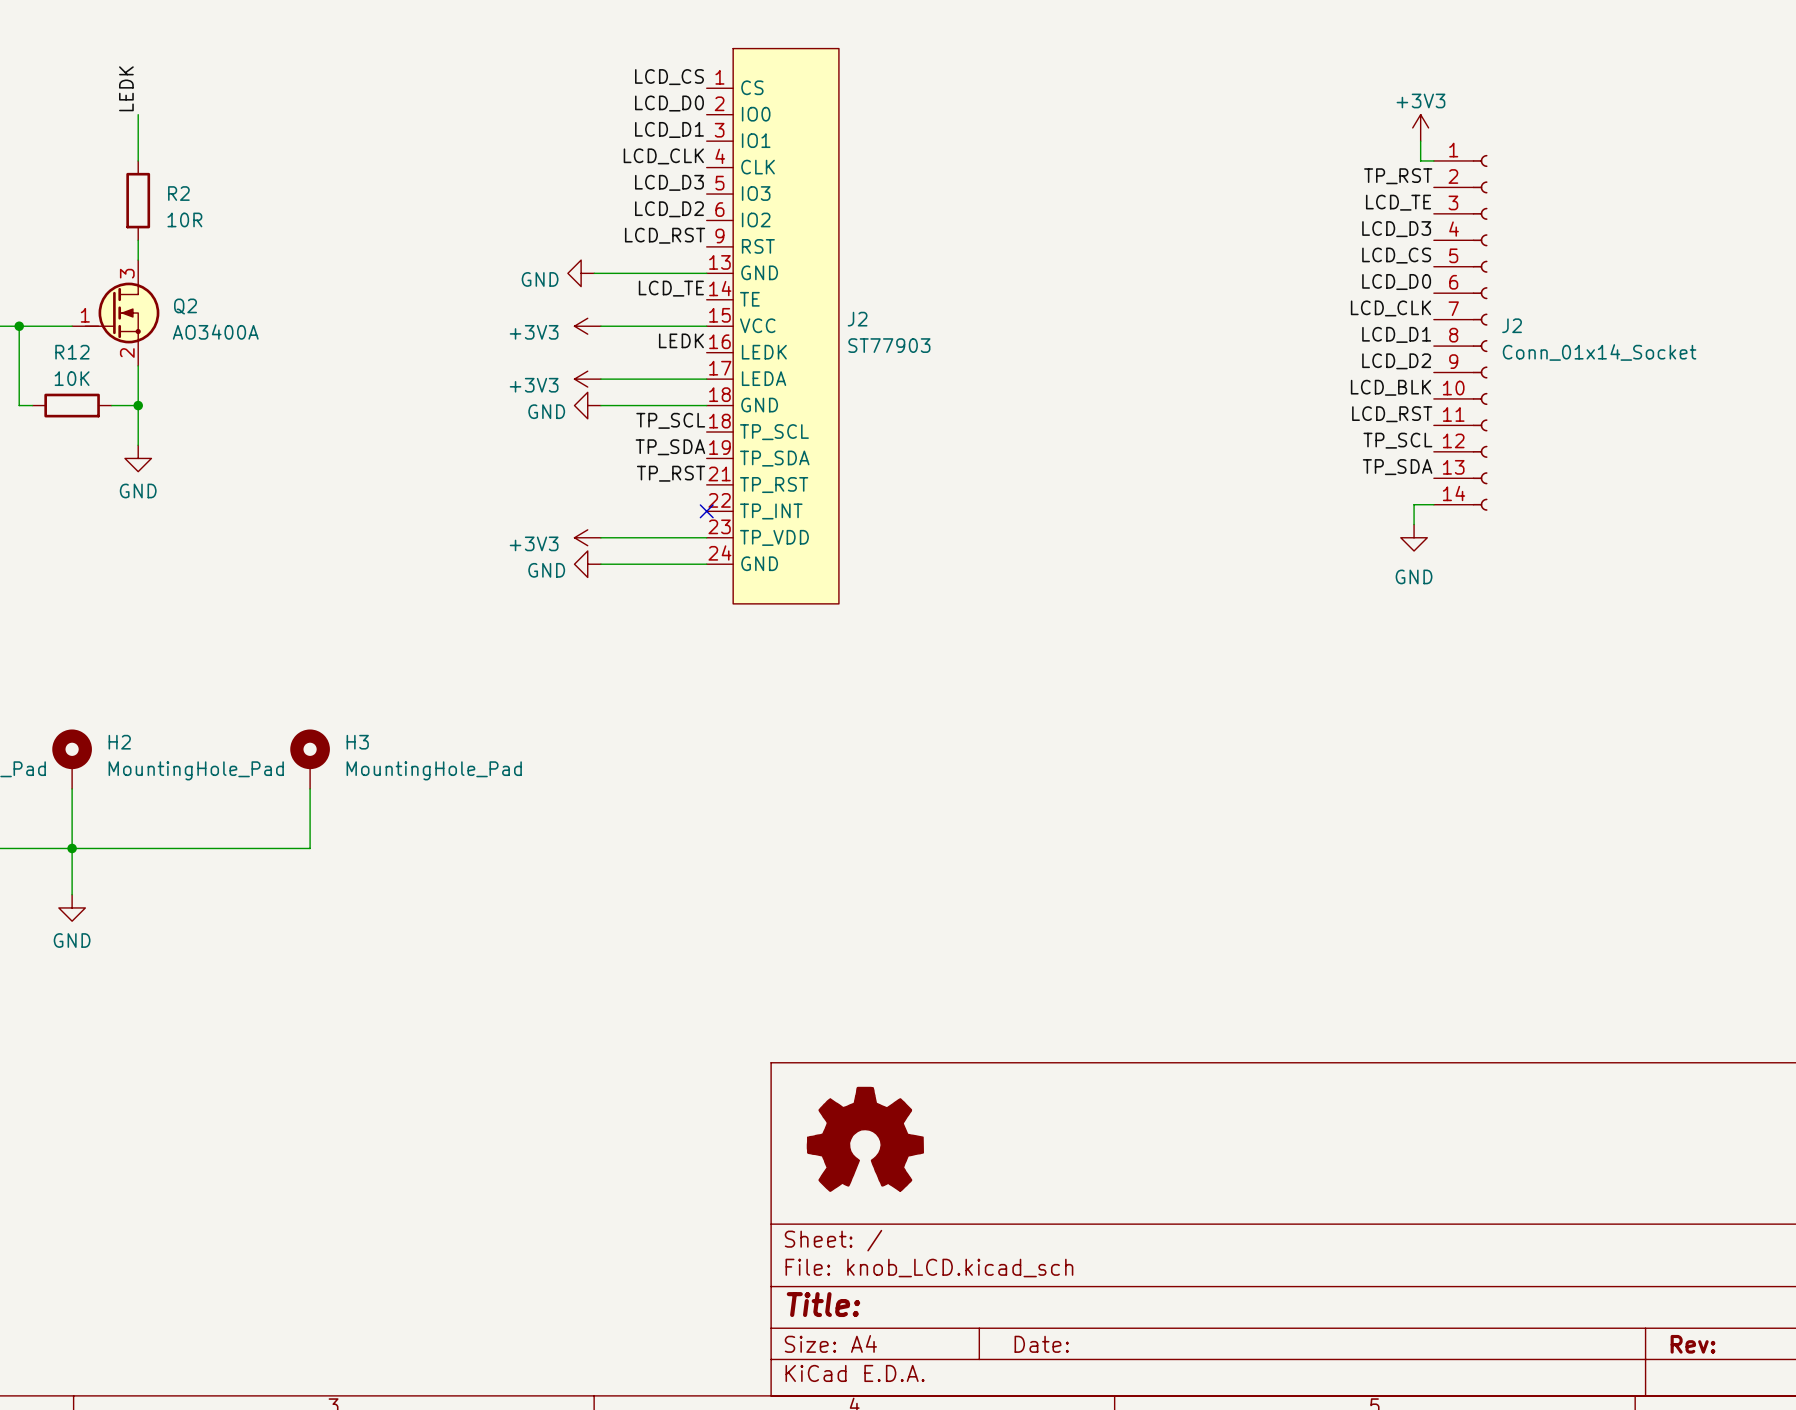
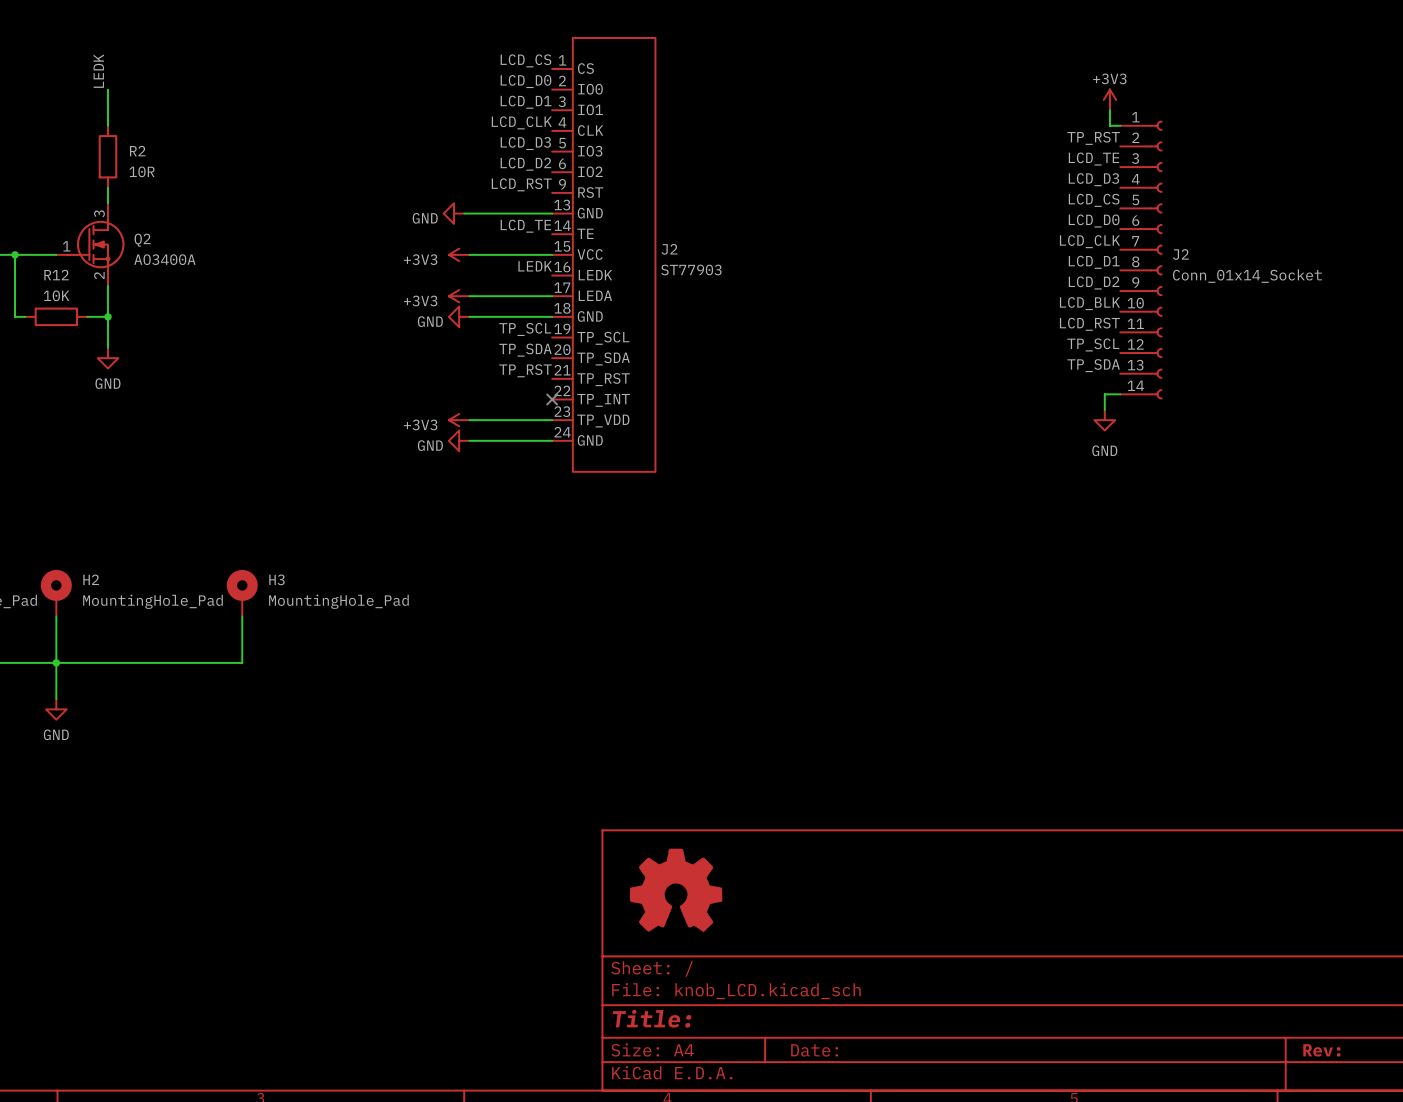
J2 pin number: 18 (719, 421) -> 19 (562, 328)
J2 pin number: 19 (719, 447) -> 20 (562, 349)

